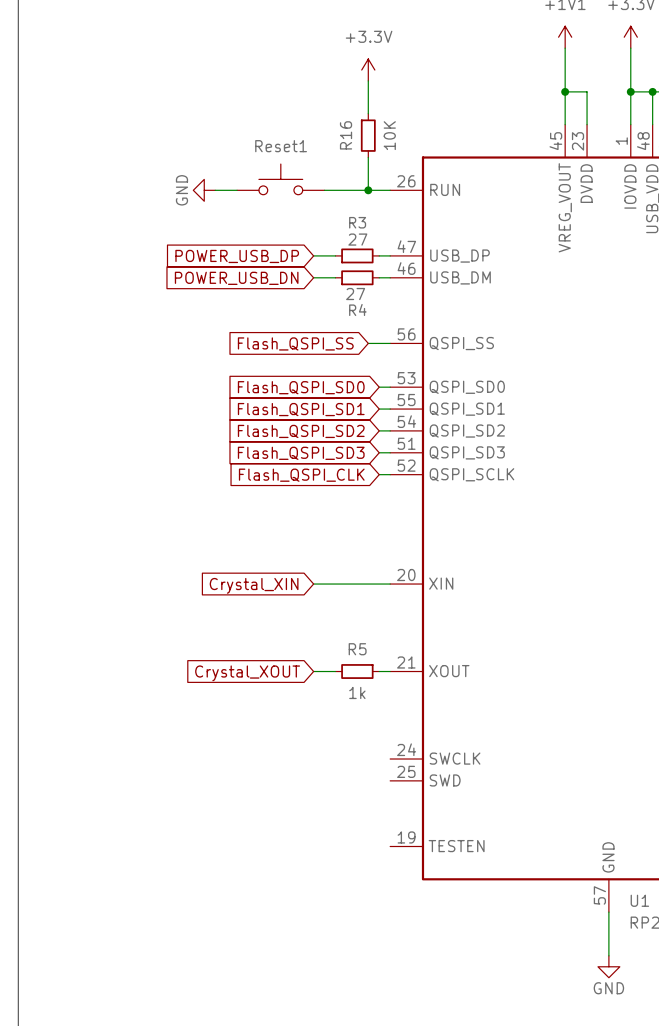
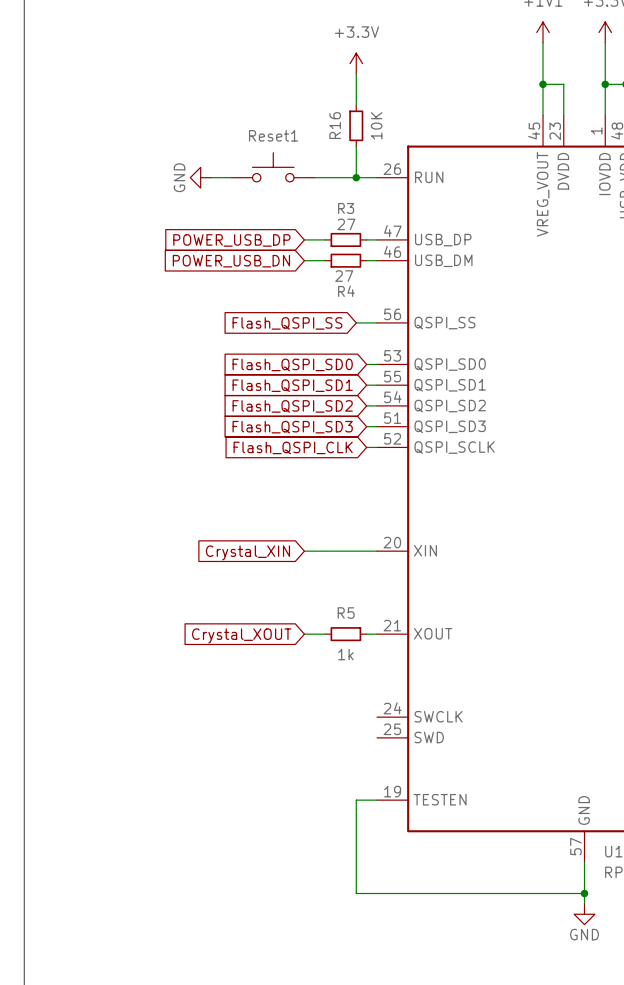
wire: none -> (377, 800) (356, 800) (356, 893) (584, 893)
junction: none -> (584, 893)

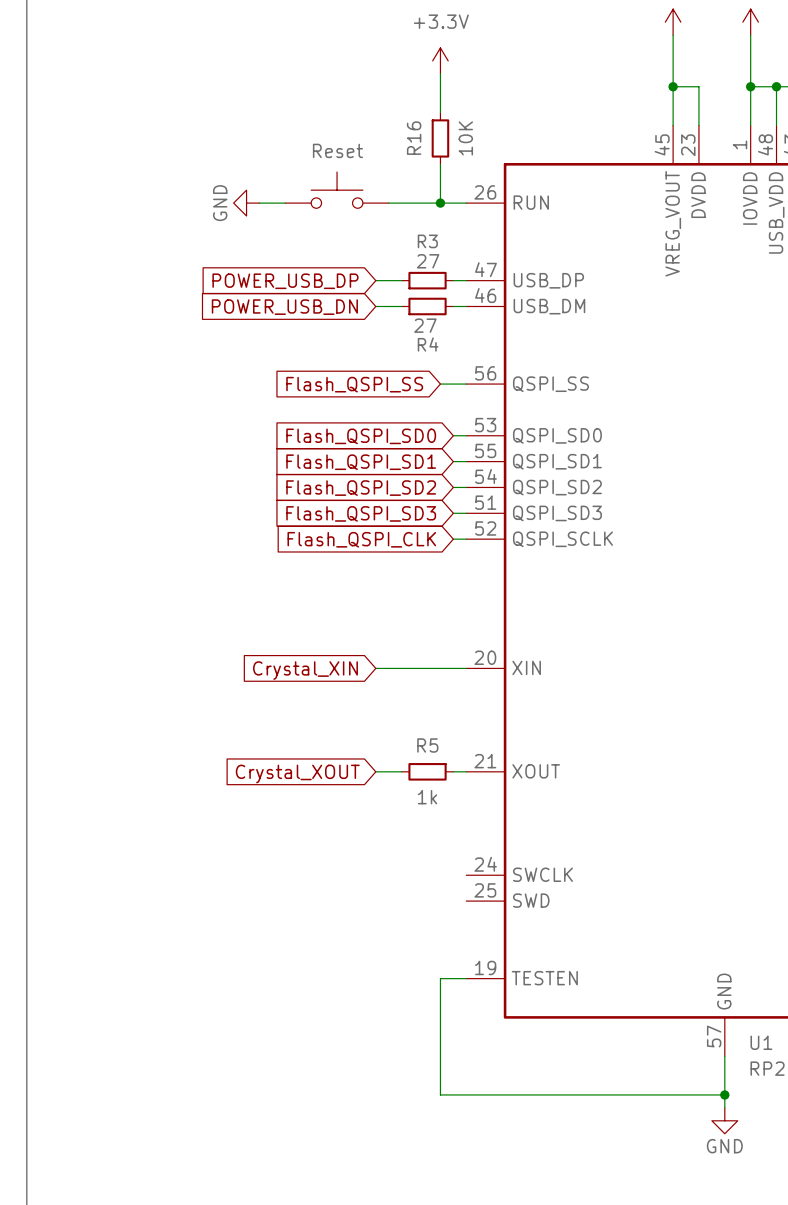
Reset1 name: Reset1 (273, 135) -> none
Reset1 value: none -> Reset (337, 150)

